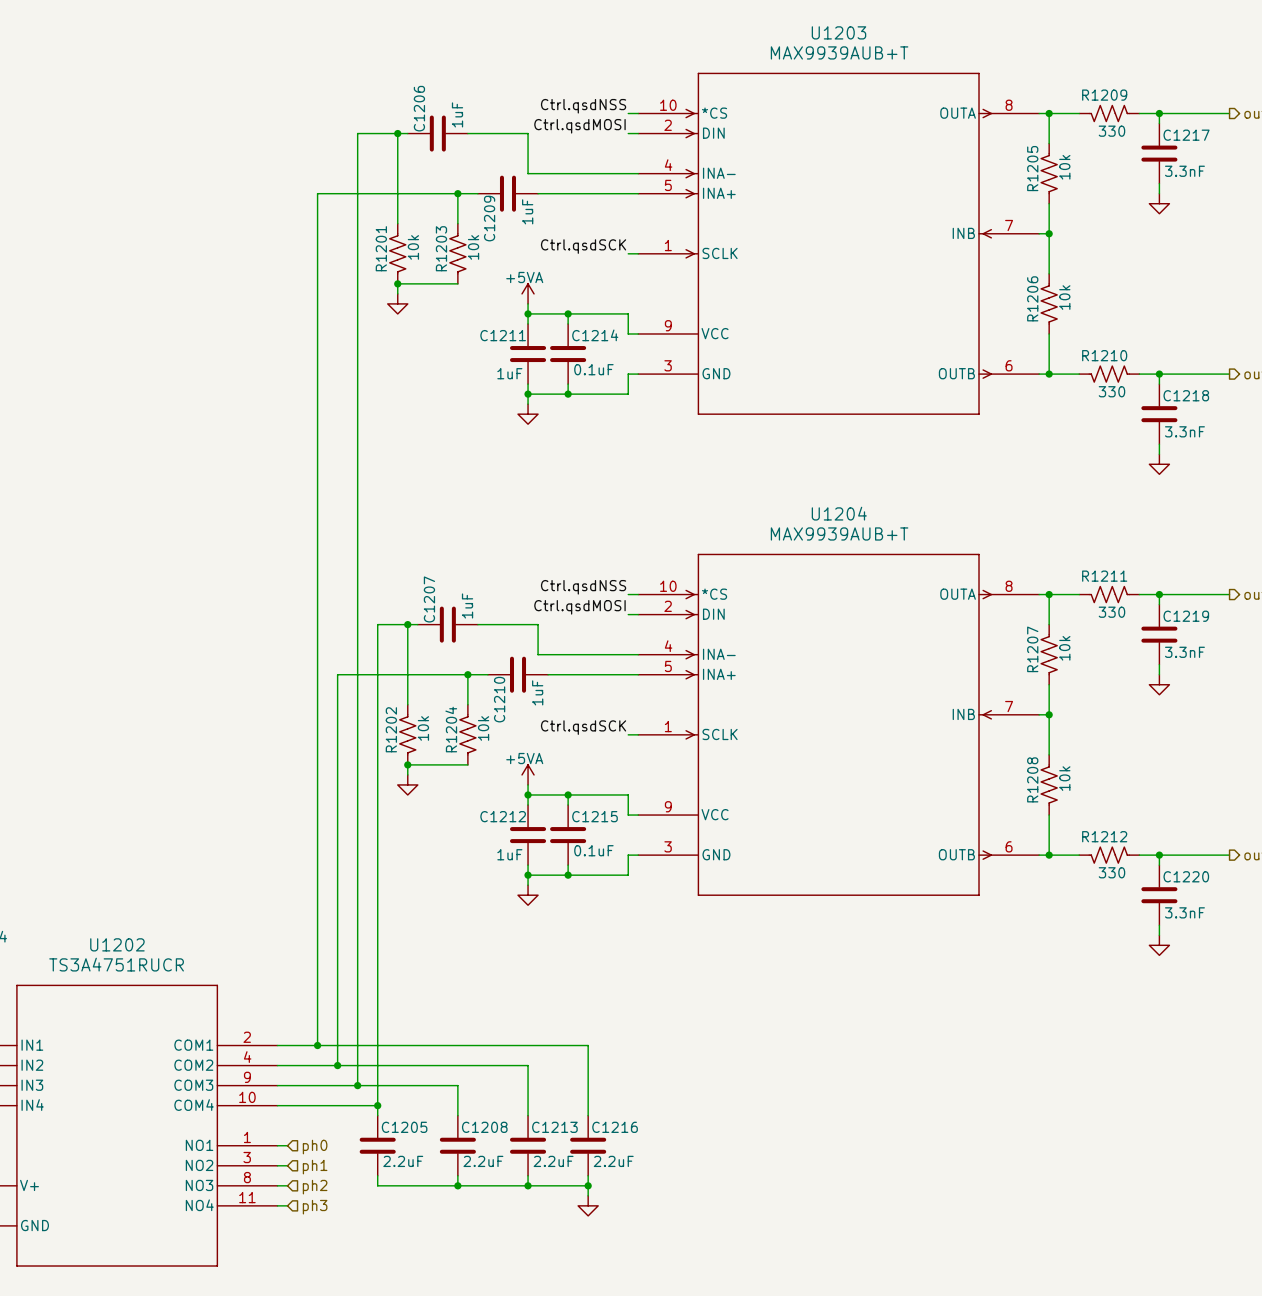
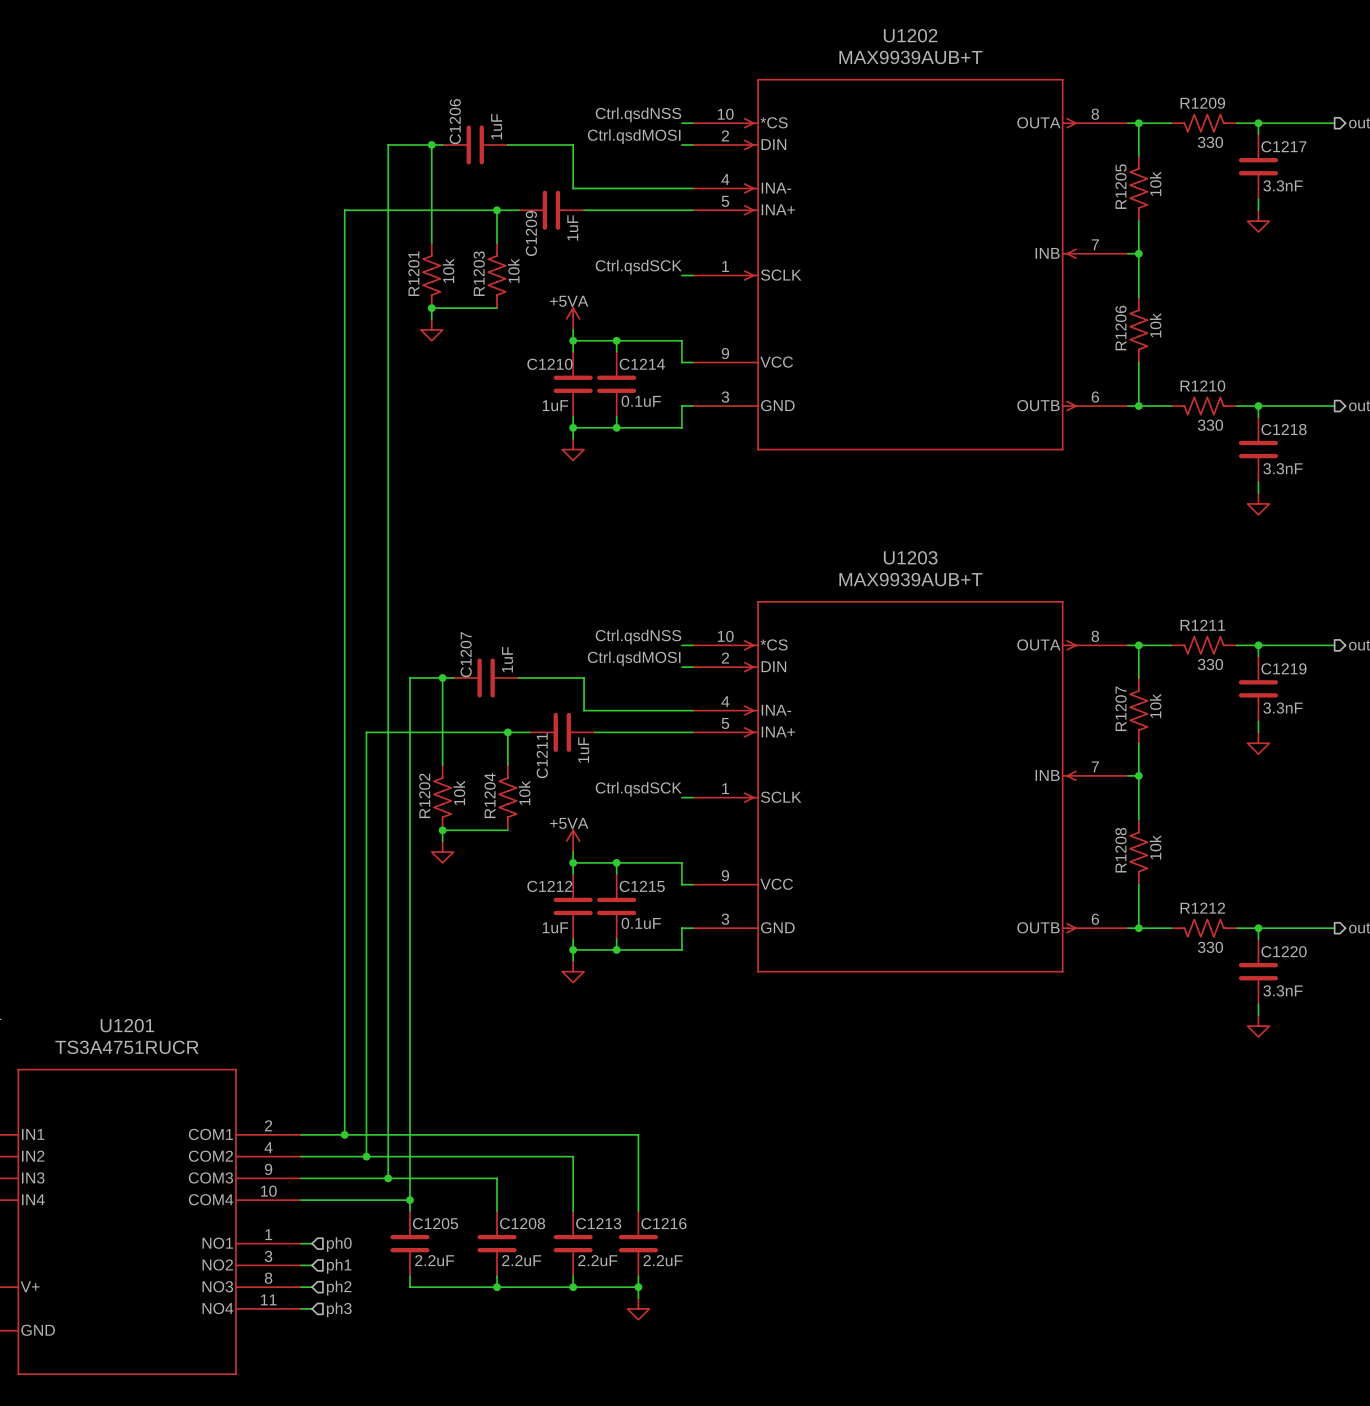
U1203 name: U1203 (838, 32) -> U1202 (910, 35)
C1211 name: C1211 (503, 335) -> C1210 (549, 364)
U1204 name: U1204 (839, 513) -> U1203 (910, 557)
C1210 name: C1210 (499, 699) -> C1211 (542, 755)
U1202 name: U1202 (117, 944) -> U1201 (127, 1025)

